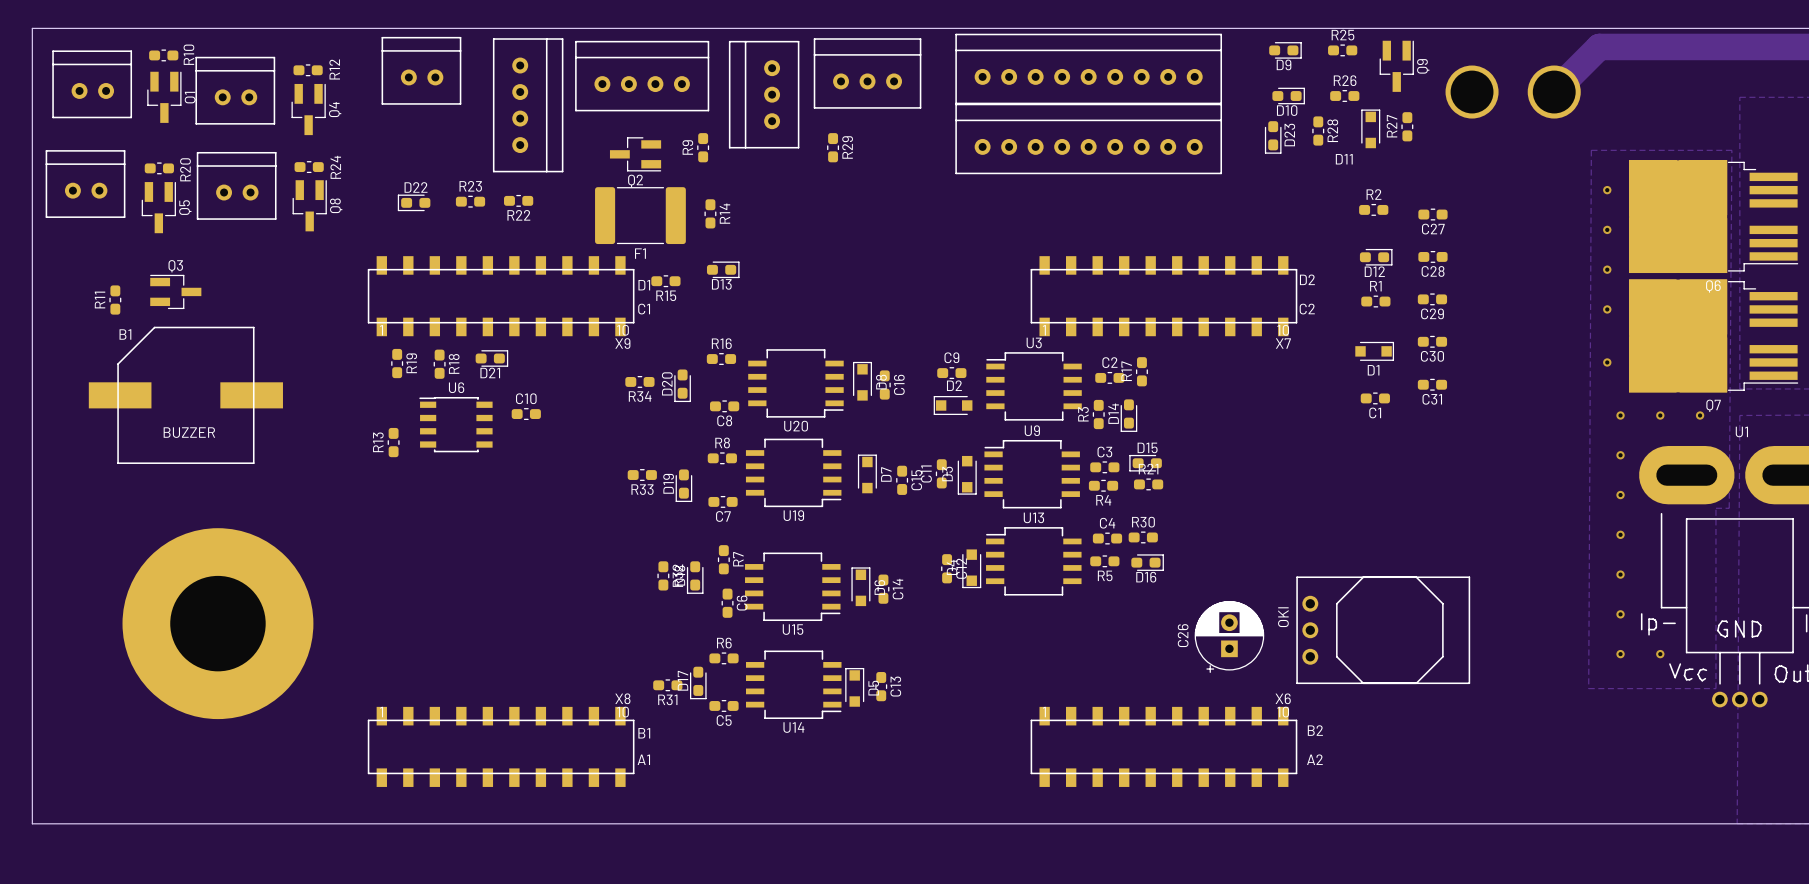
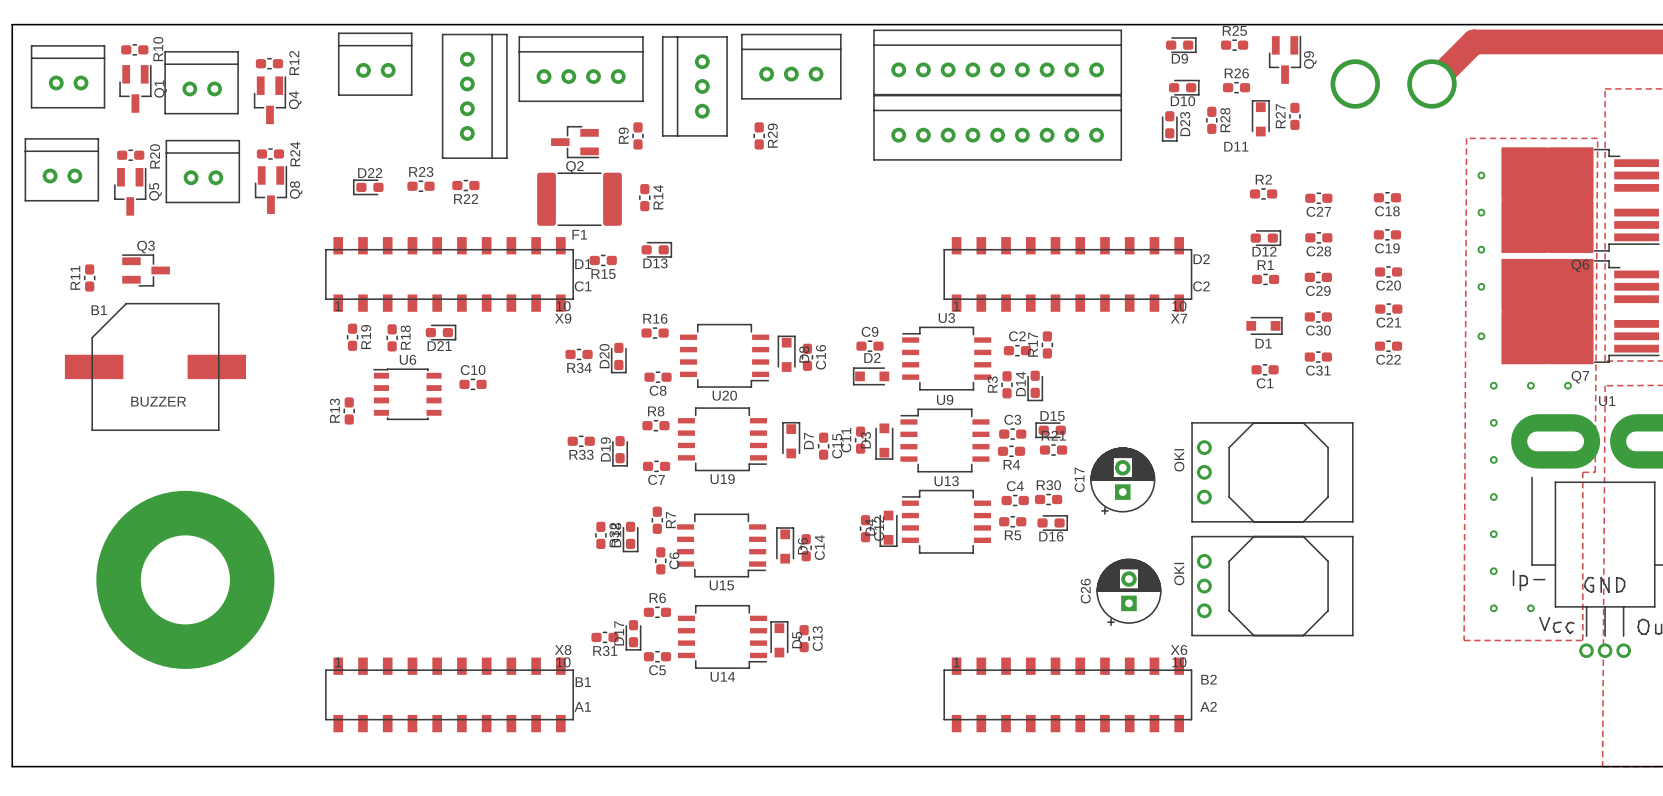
C18: none -> (1387, 197)
C19: none -> (1387, 234)
C20: none -> (1388, 271)
C21: none -> (1388, 309)
C22: none -> (1388, 346)
part: none -> OKI (1272, 472)
C17: none -> (1122, 481)

